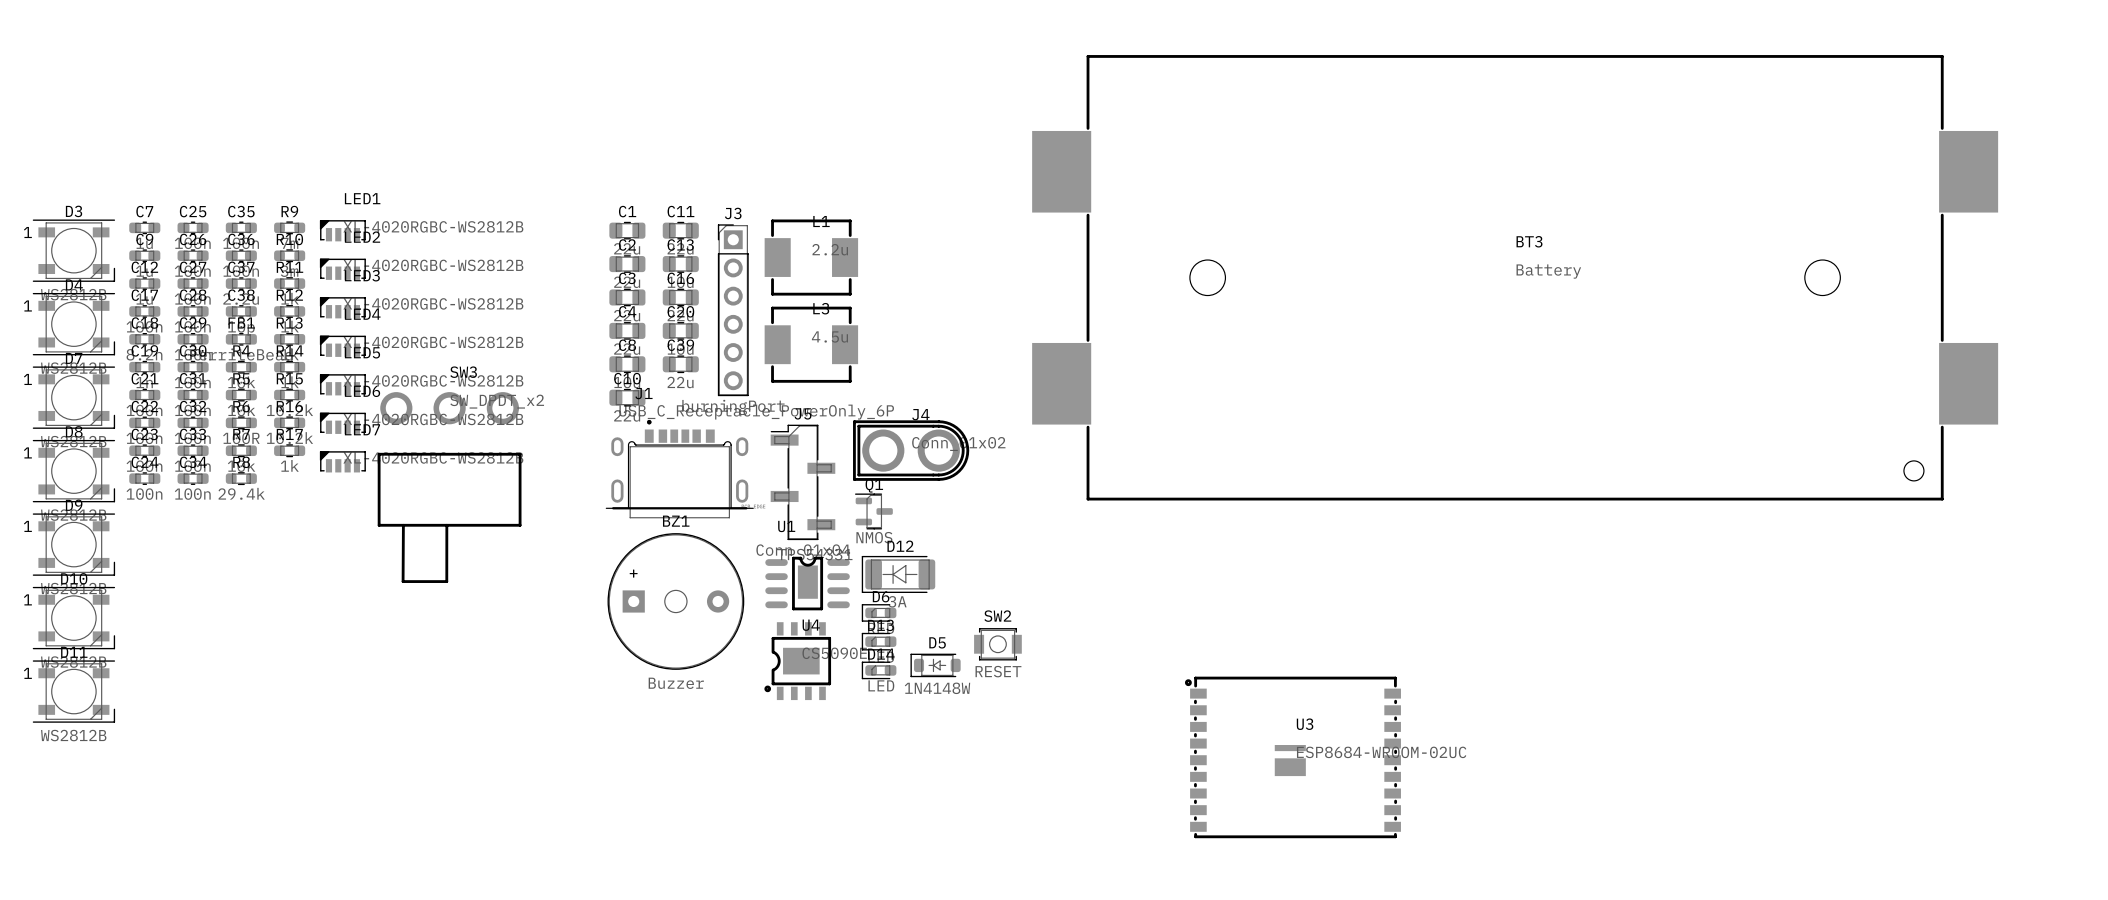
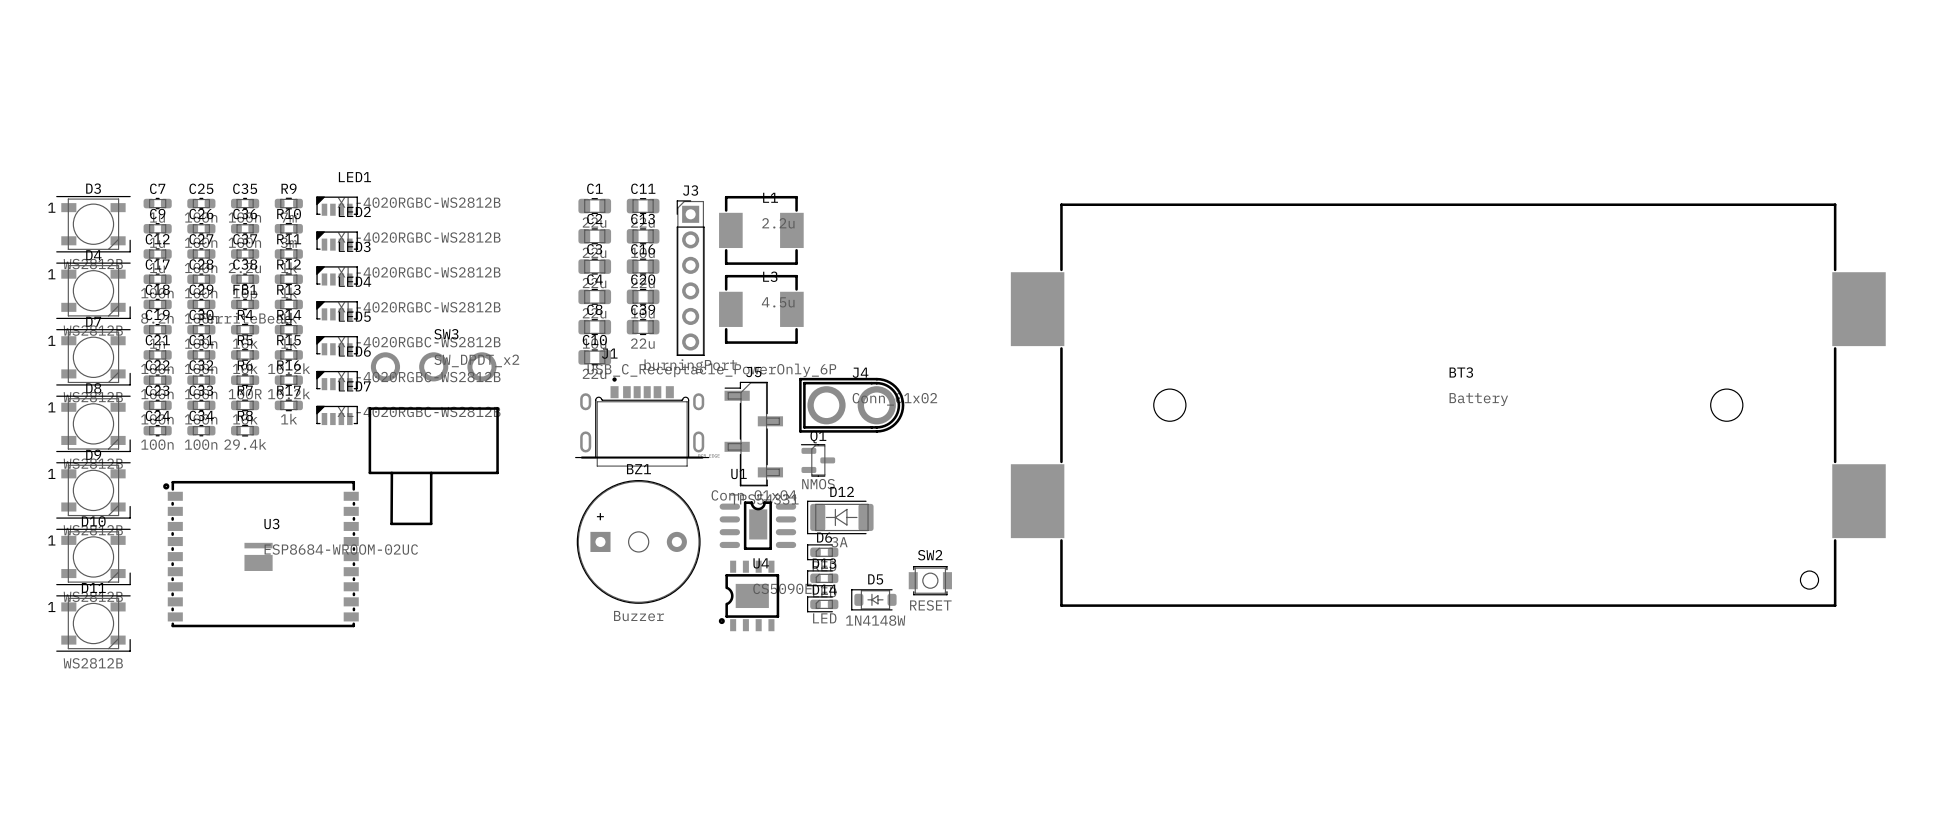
BT3 position: (1515, 277) -> (1448, 405)
U3 position: (1292, 757) -> (260, 554)

